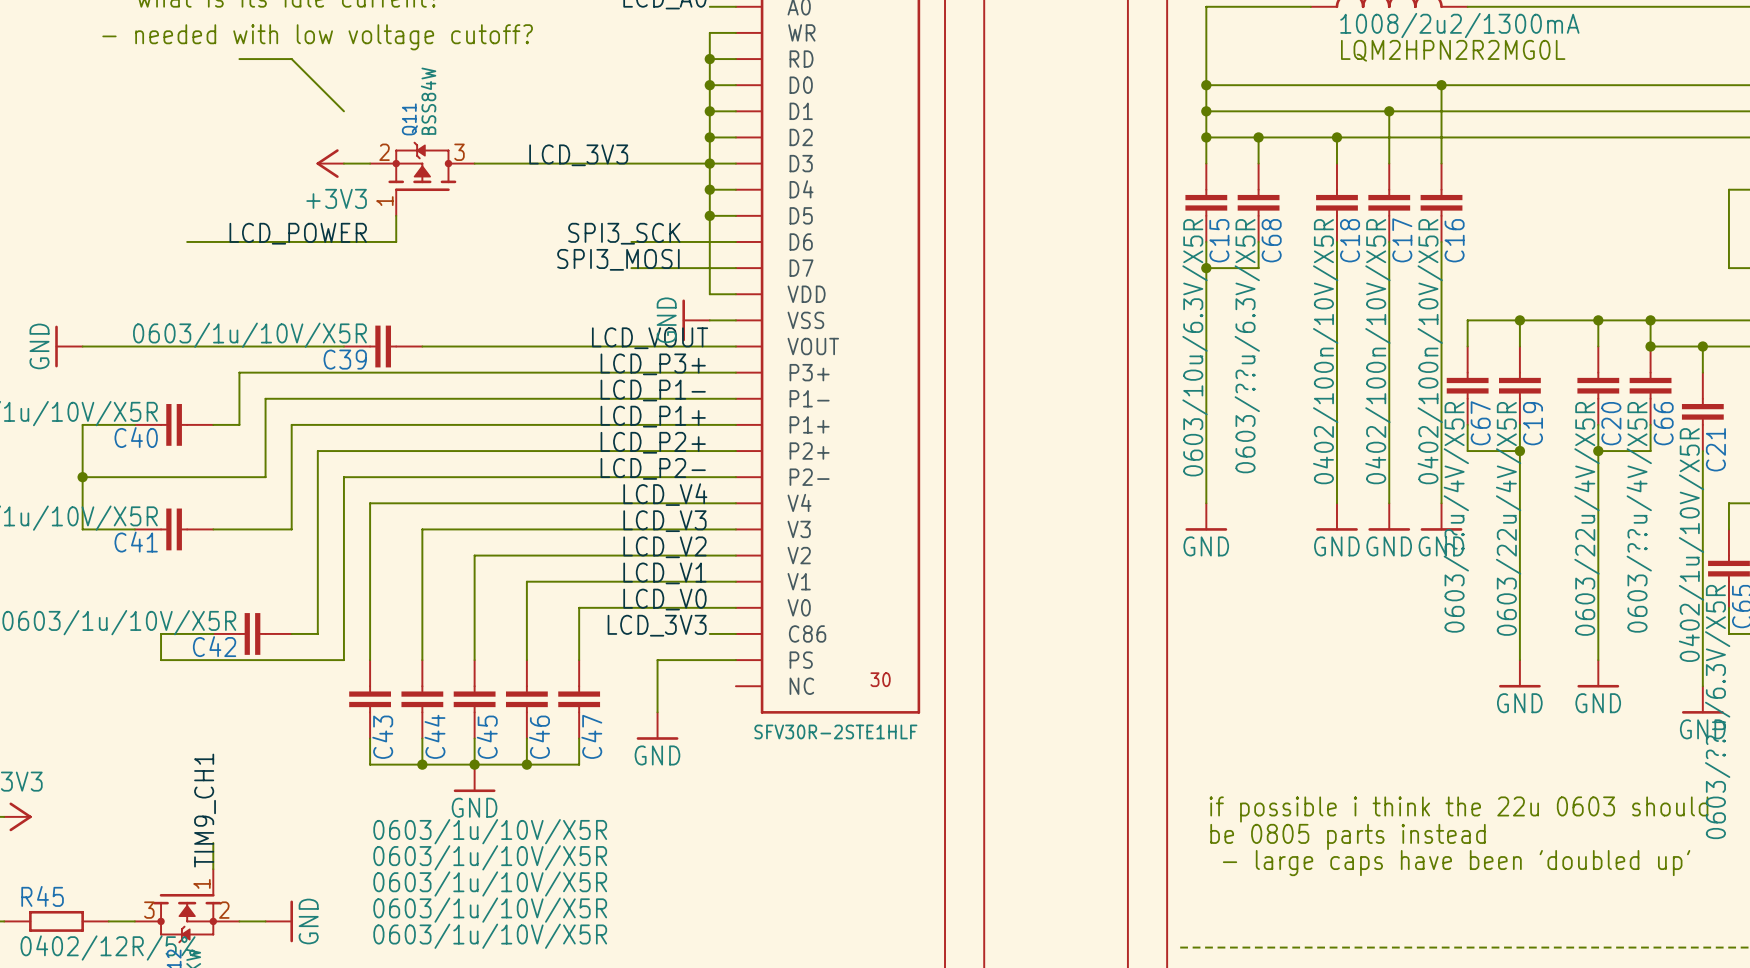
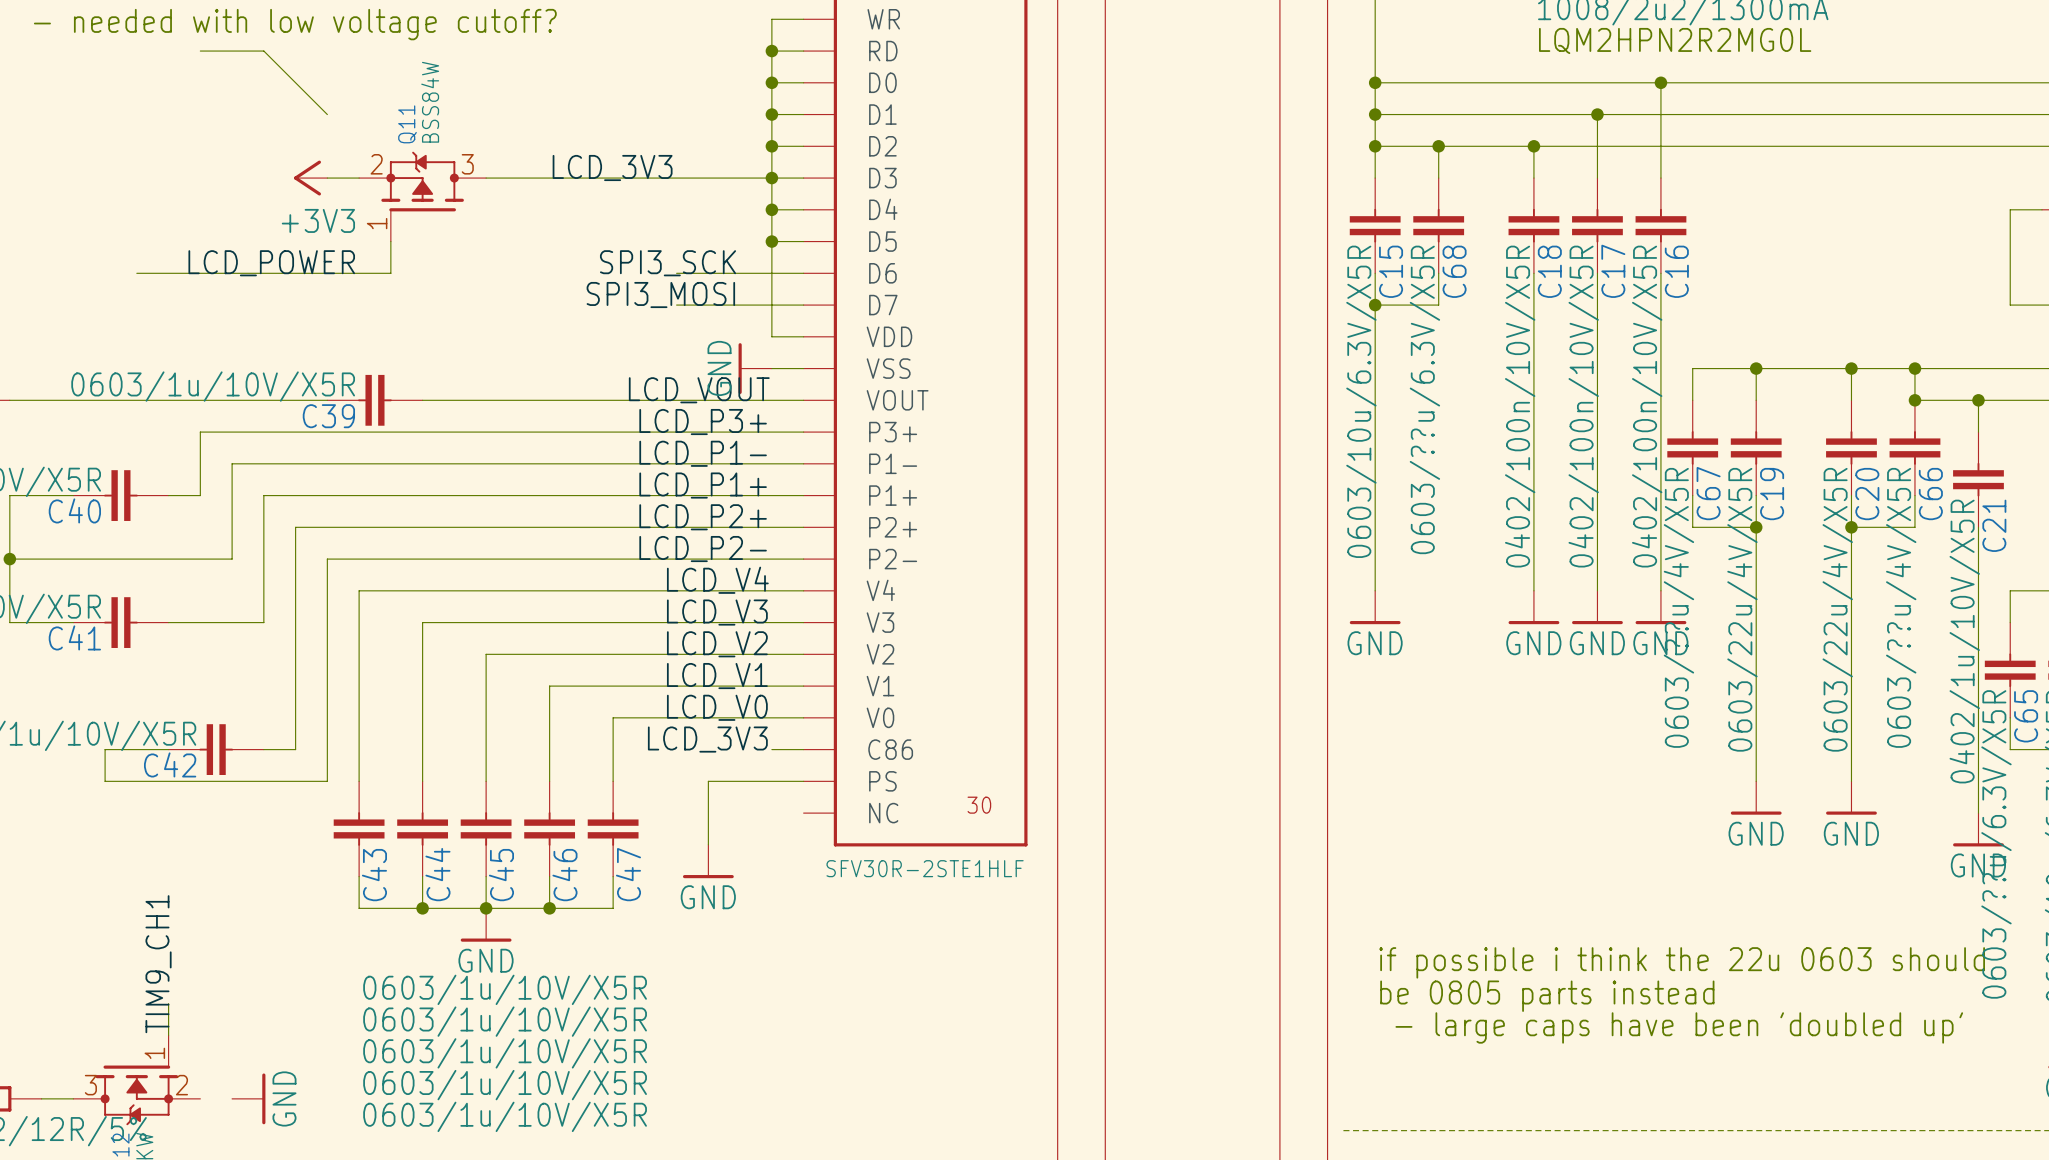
wire: (239, 921) (265, 921) -> none

